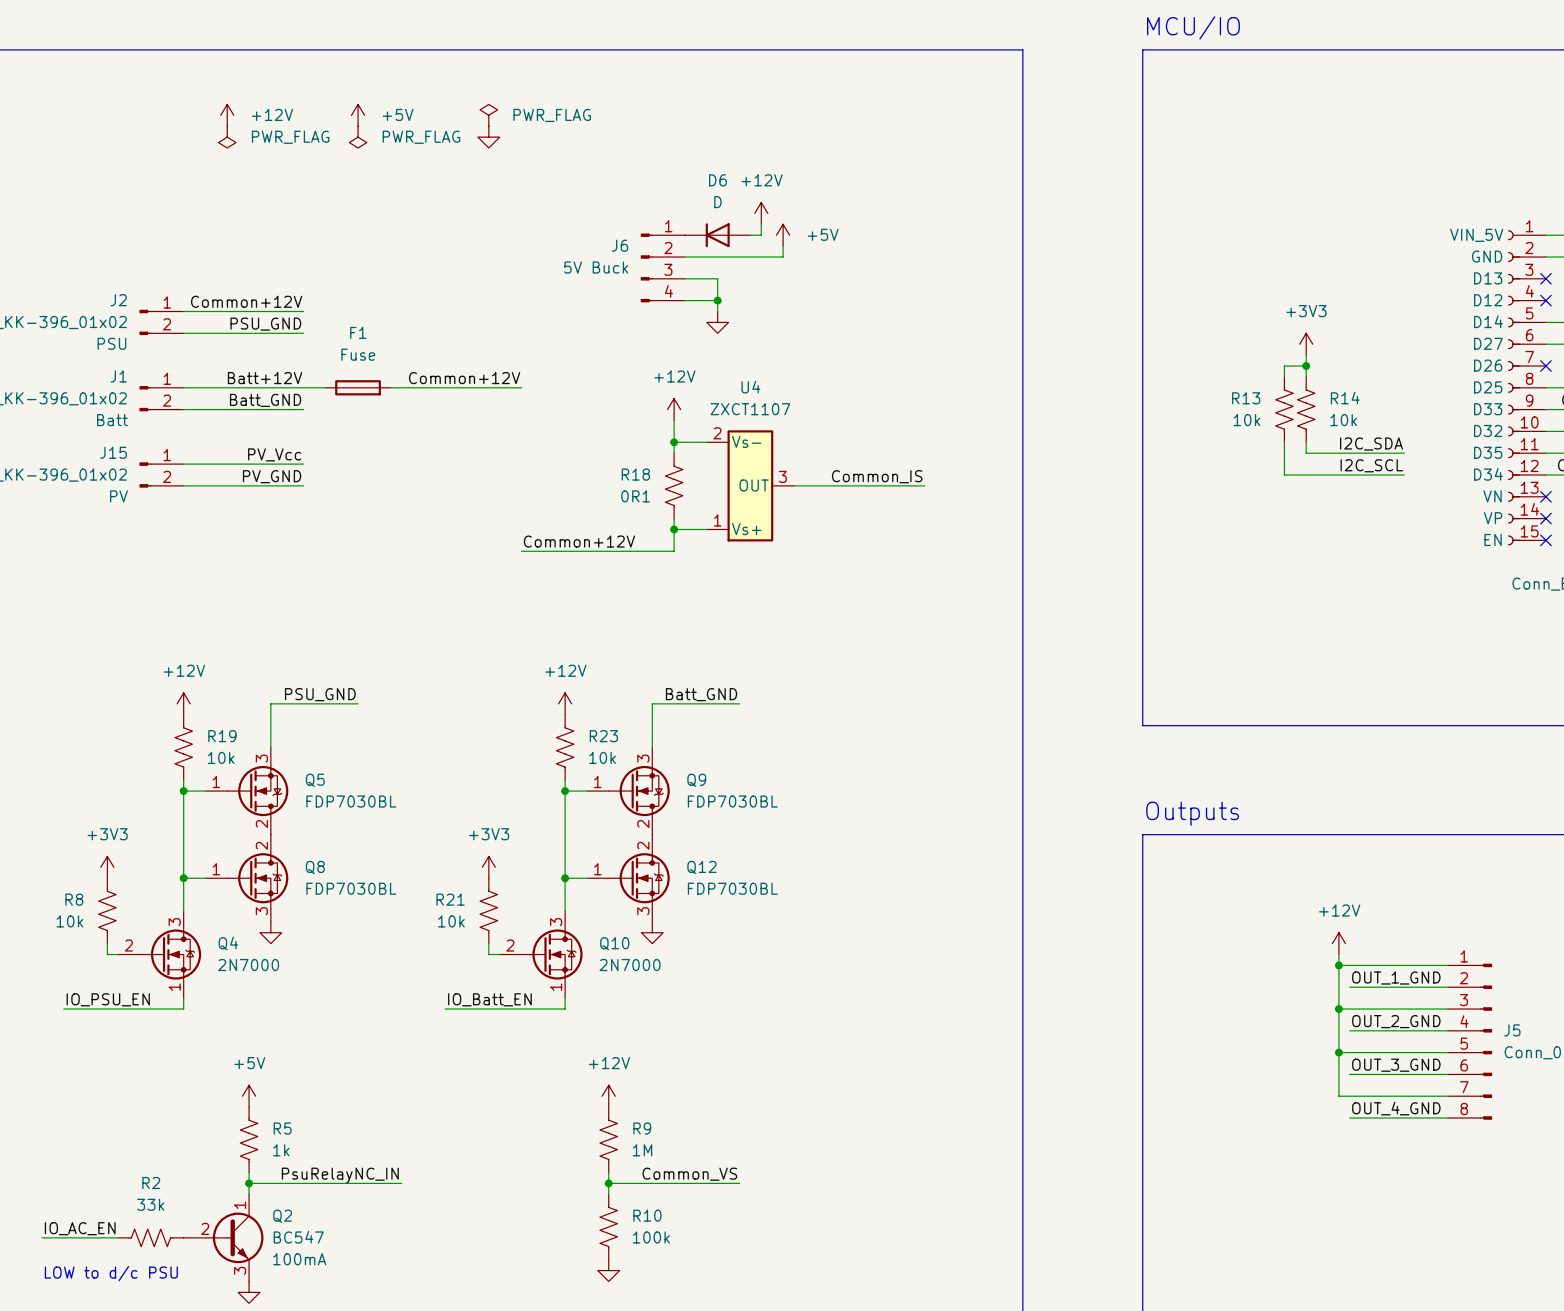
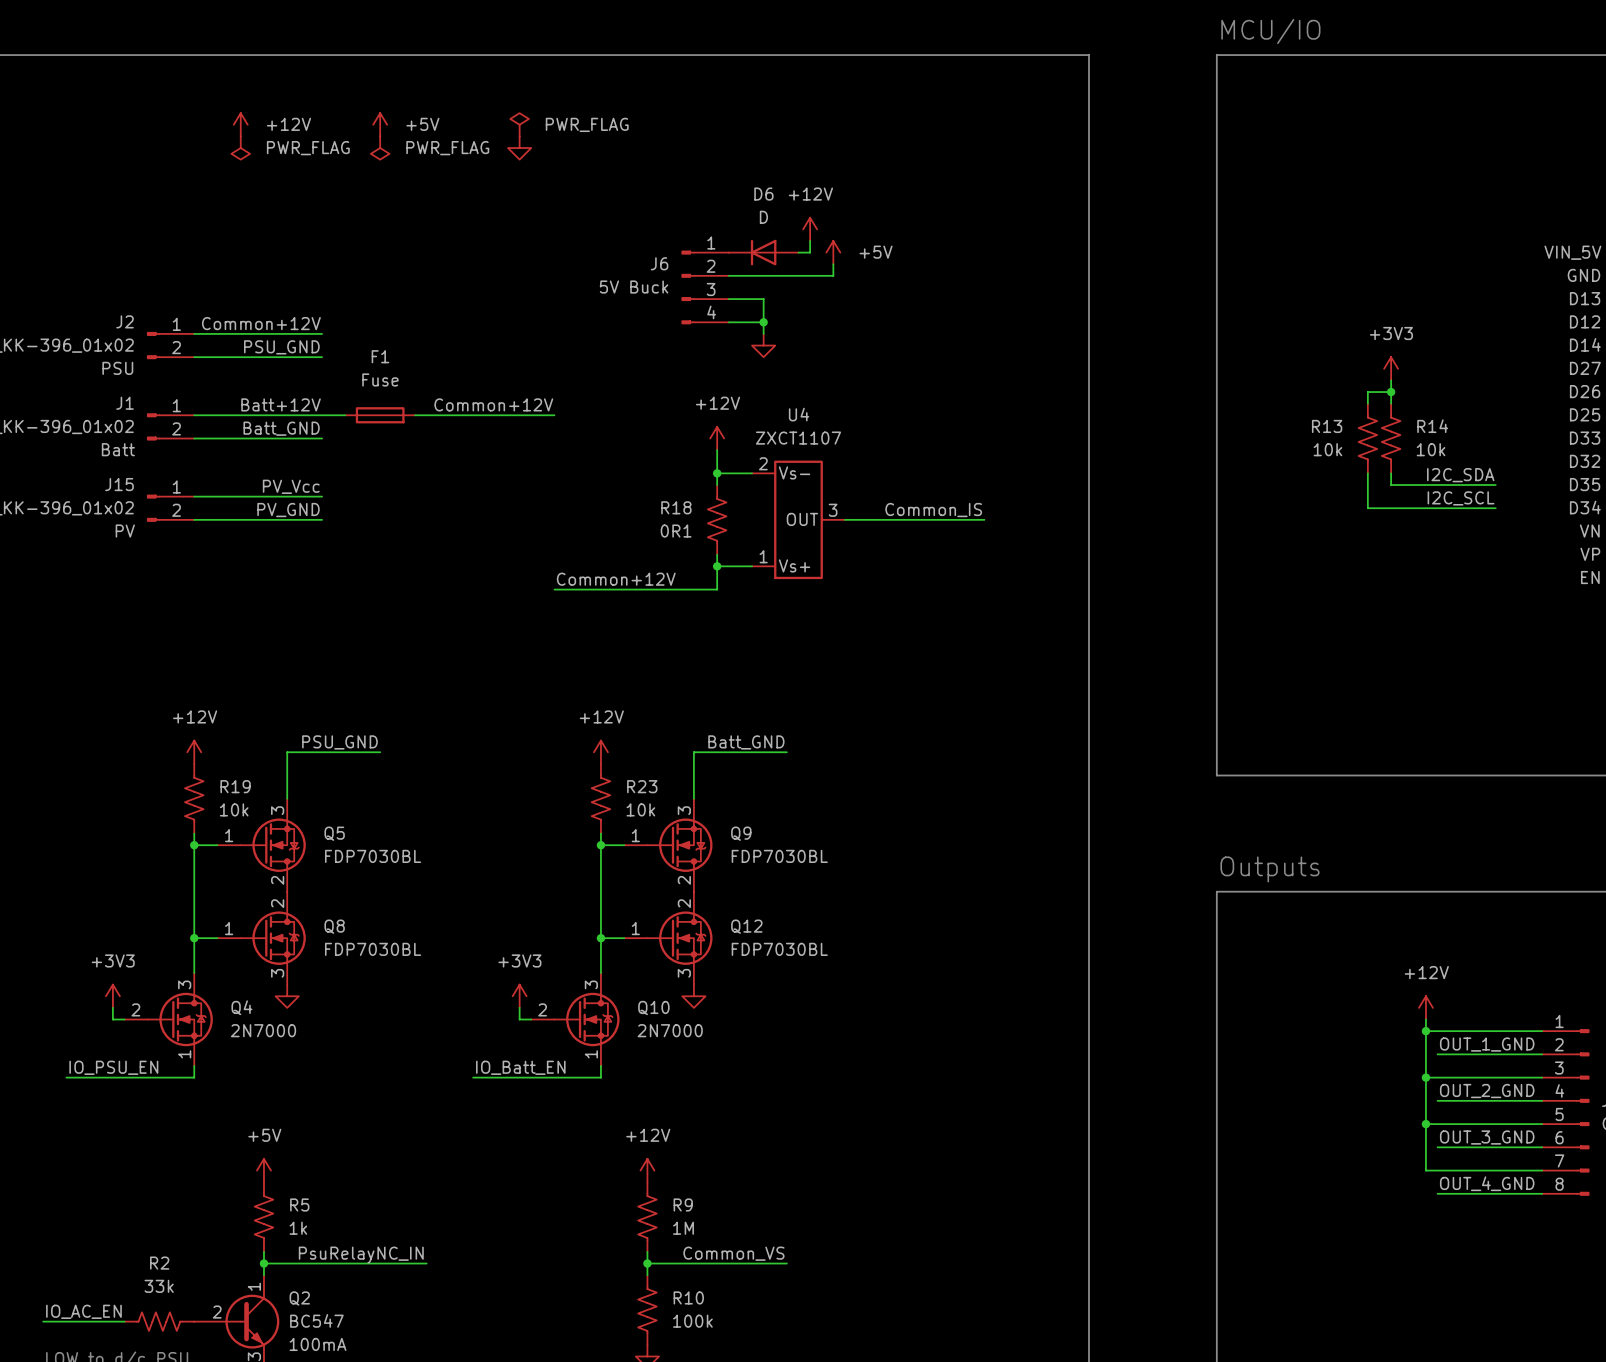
power symbol position: +3V3 (107, 867) -> +3V3 (112, 996)
power symbol position: +3V3 (488, 867) -> +3V3 (519, 996)
R8: 10k (107, 910) -> none
R21: 10k (488, 910) -> none

